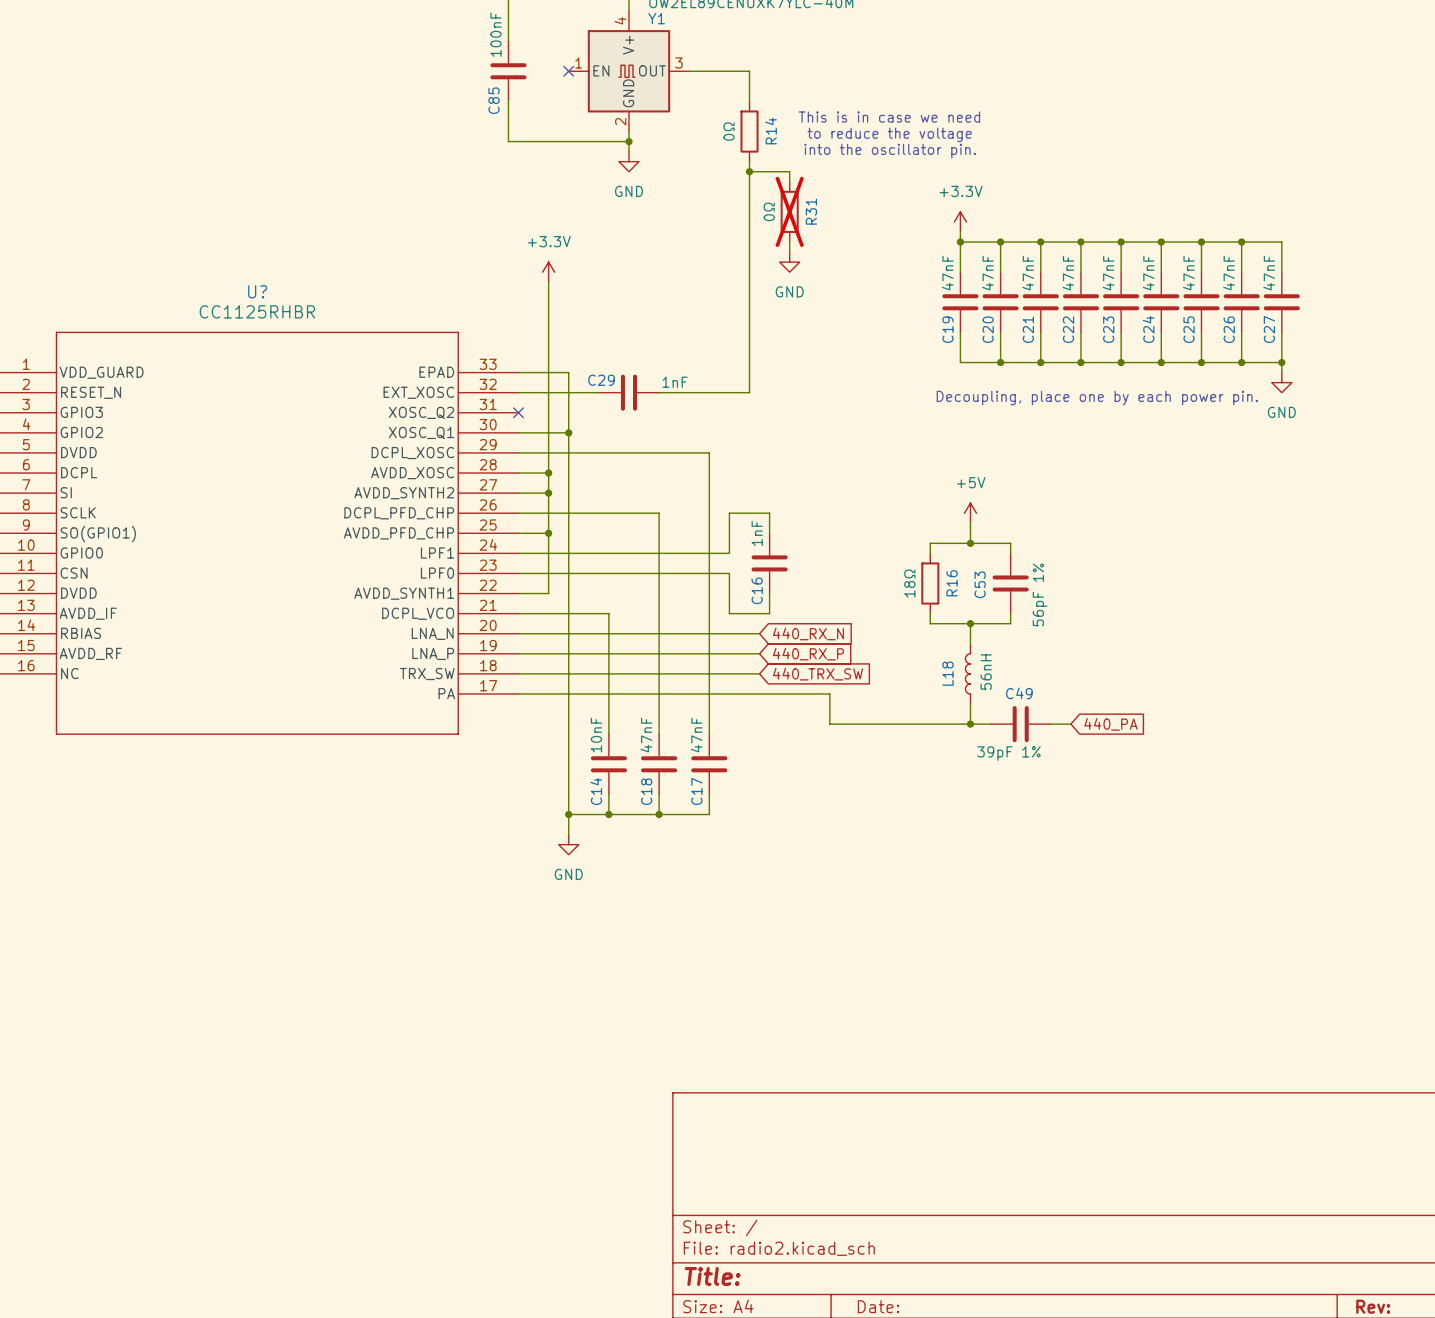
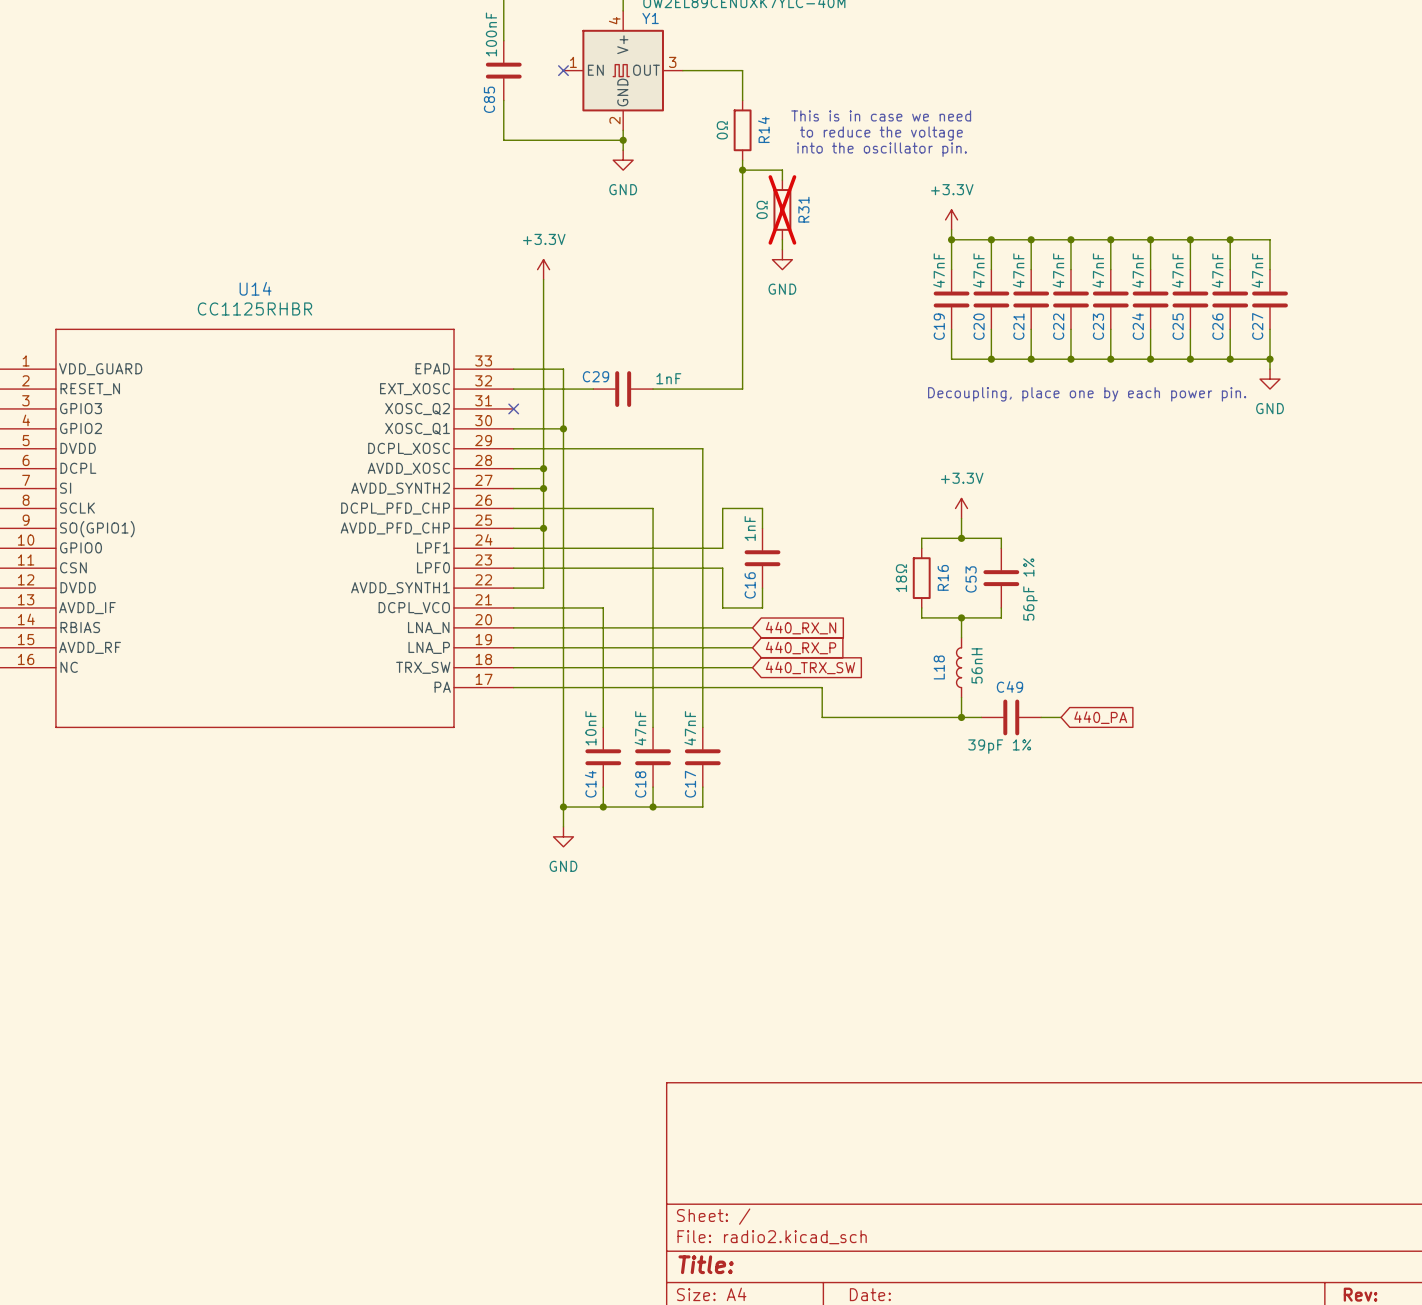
U? name: U? (257, 291) -> U14 (255, 288)
power symbol: +5V (970, 513) -> +3.3V (961, 508)

